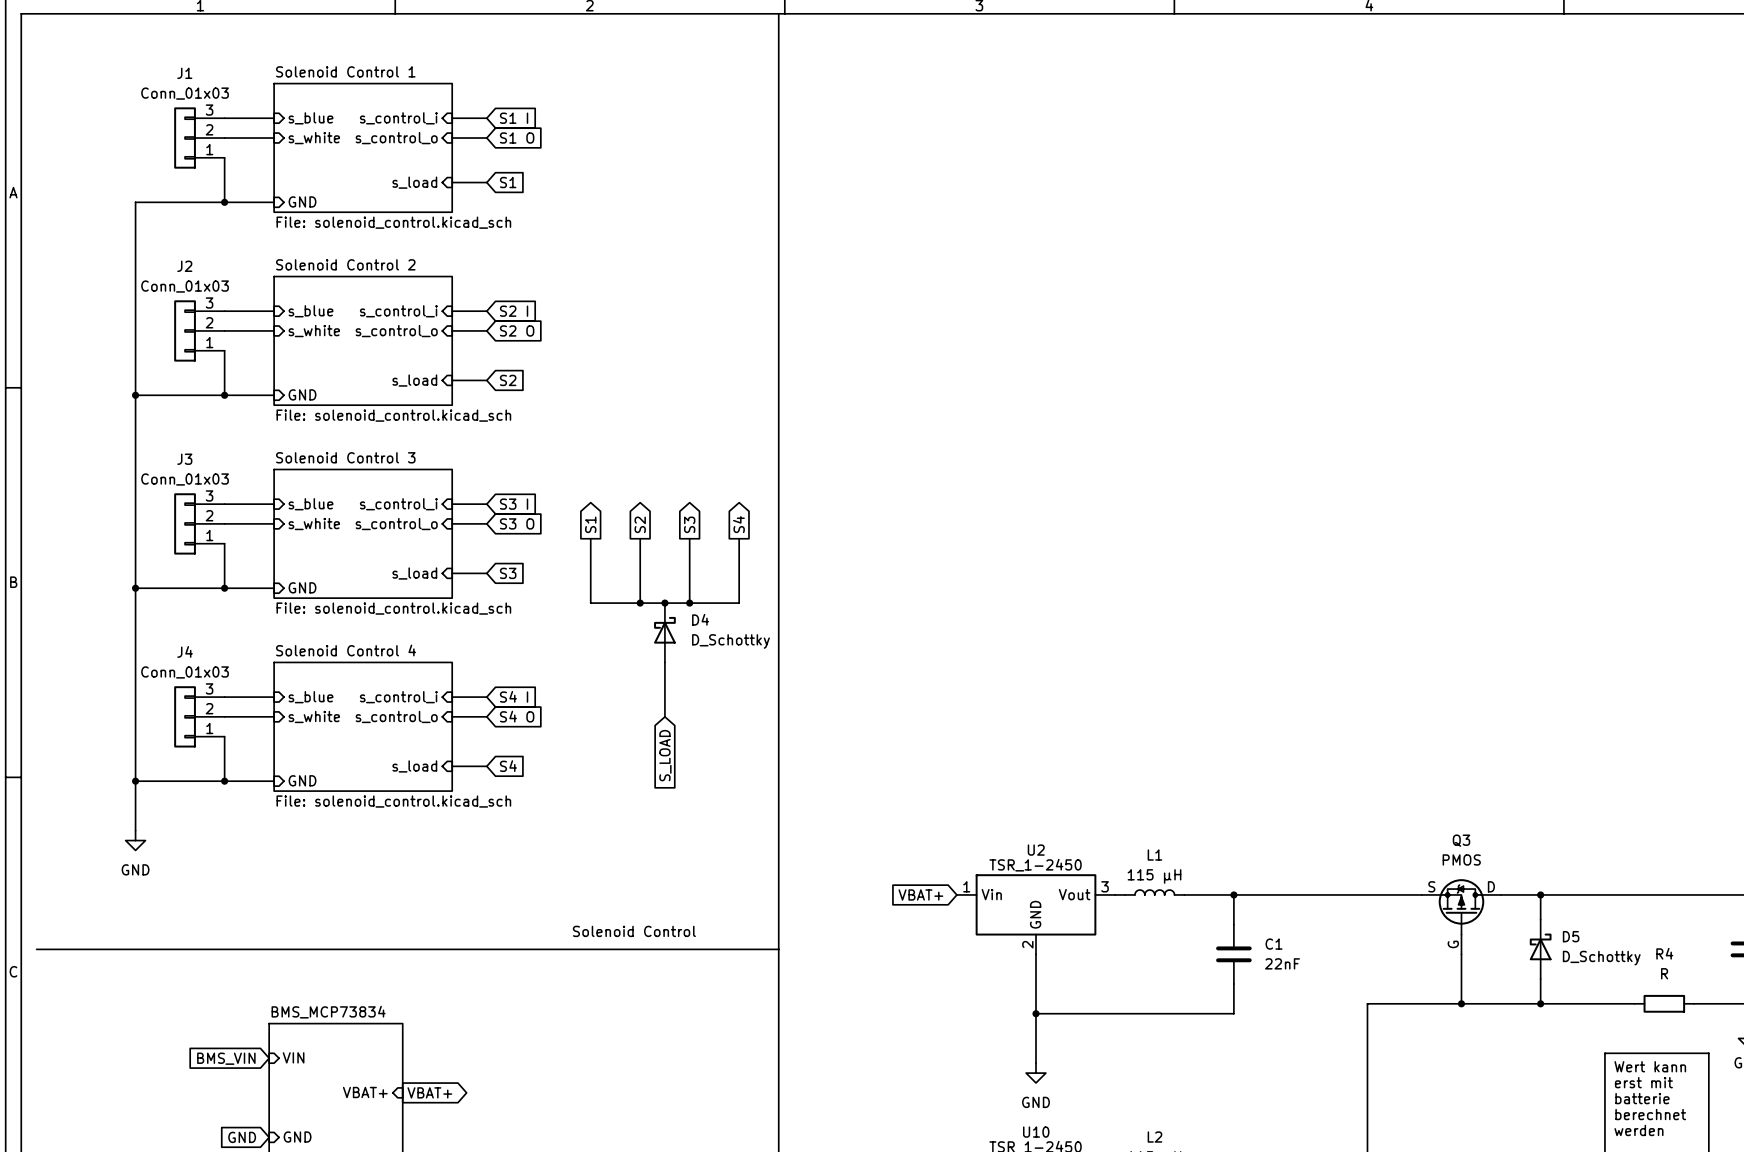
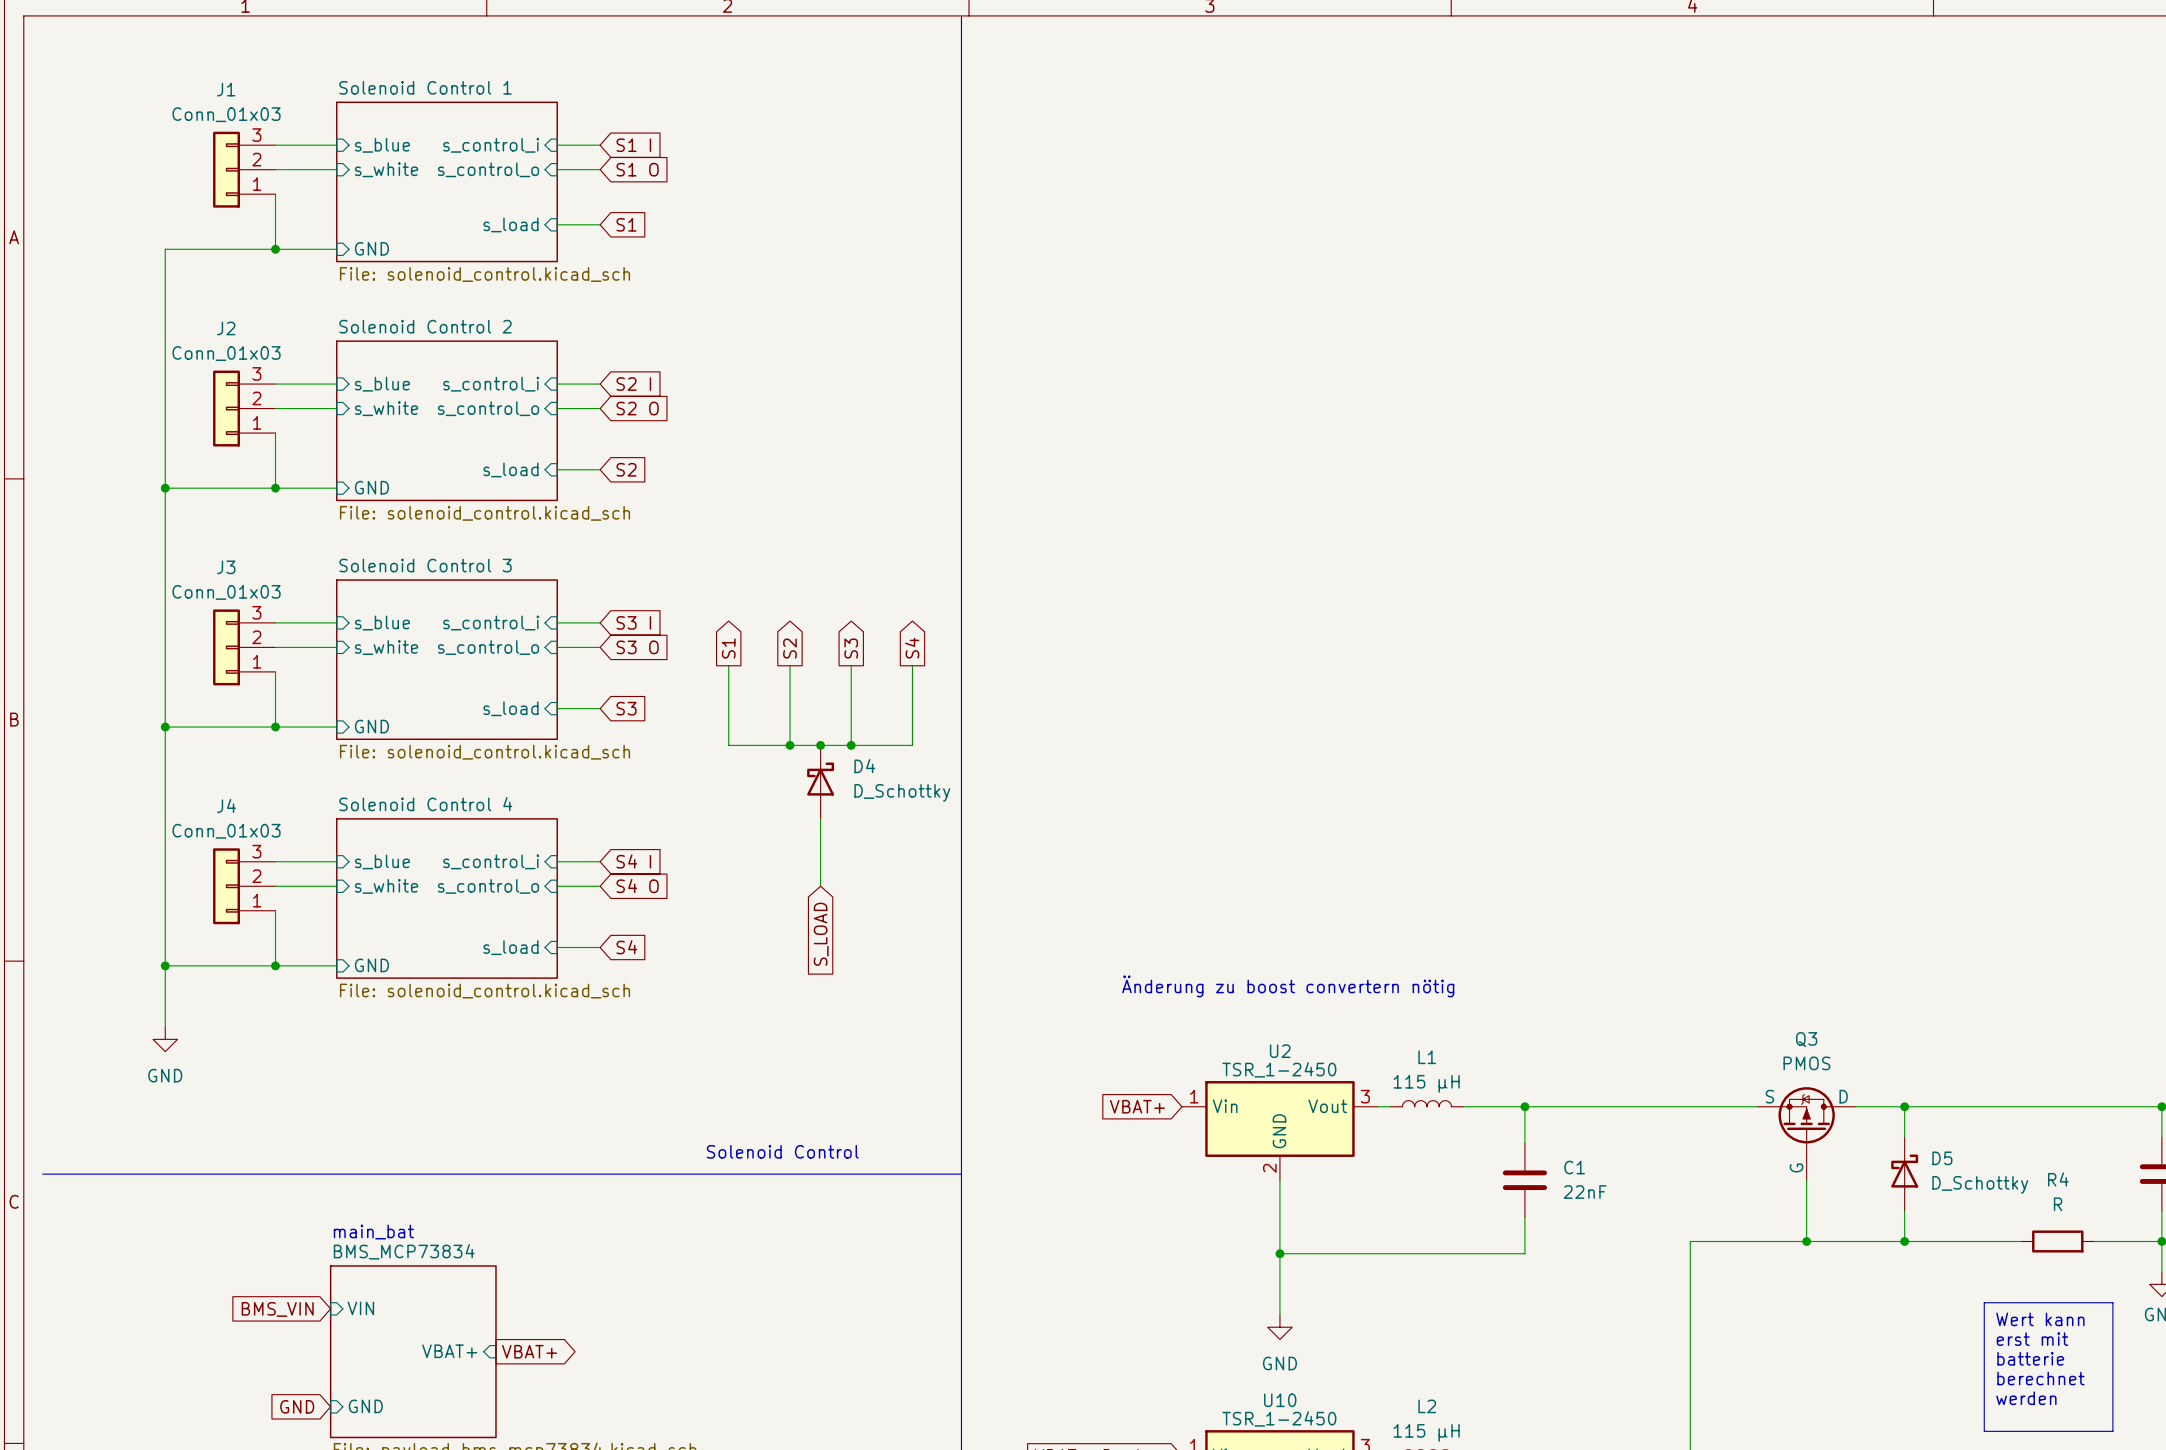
text: none -> Änderung zu boost convertern nötig (1288, 986)
text: none -> main_bat (373, 1232)

